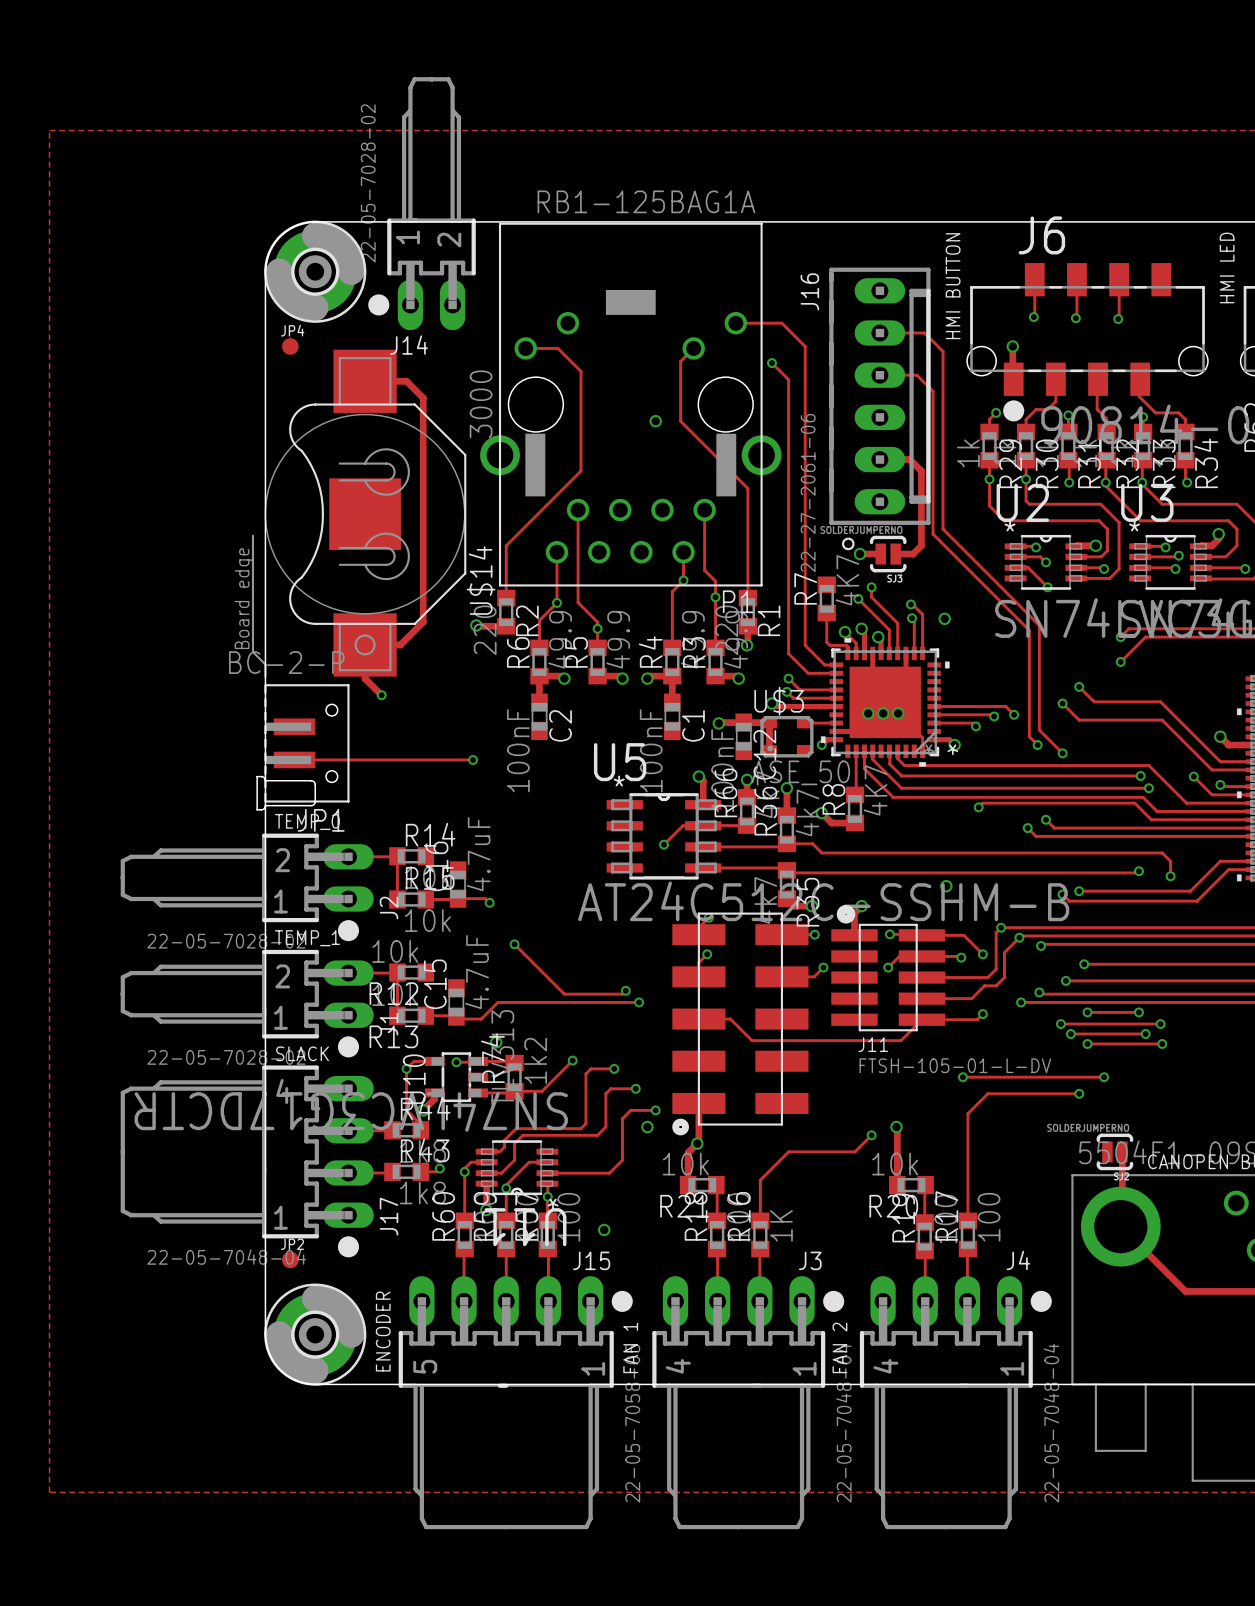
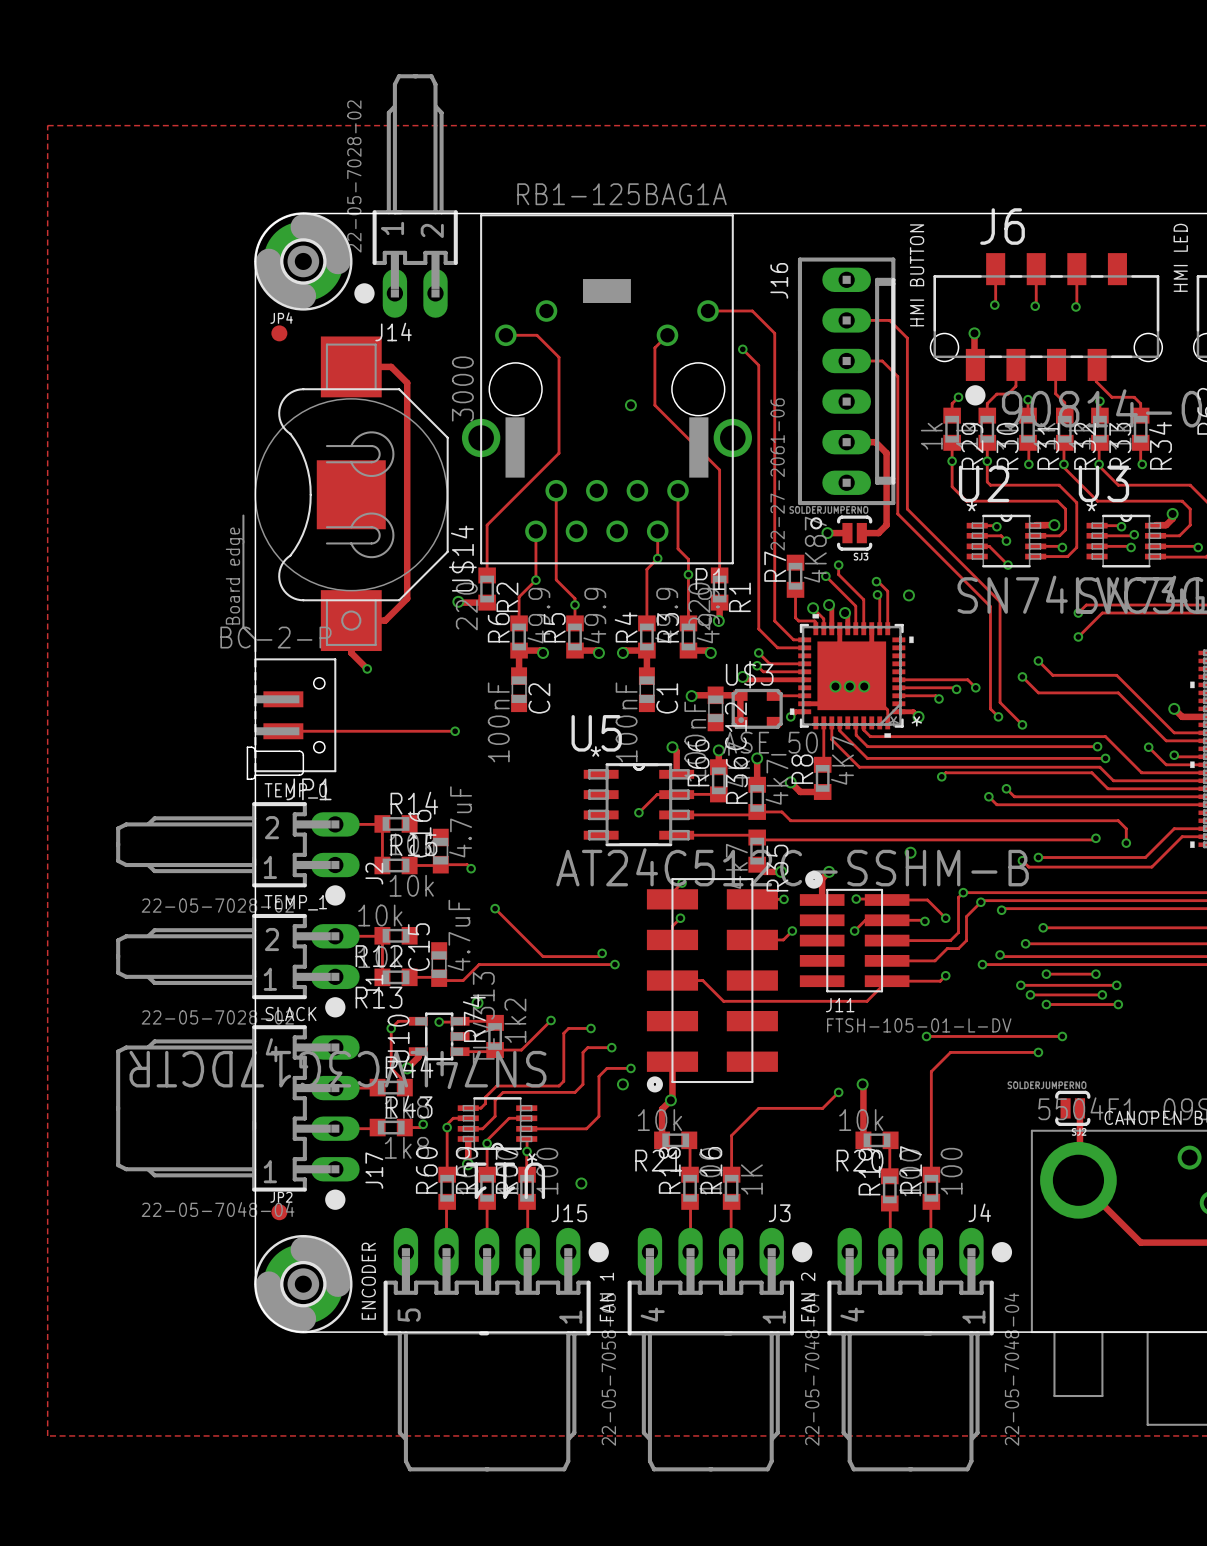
R7 value: 4K7 (847, 580) -> 4K87 (815, 549)

